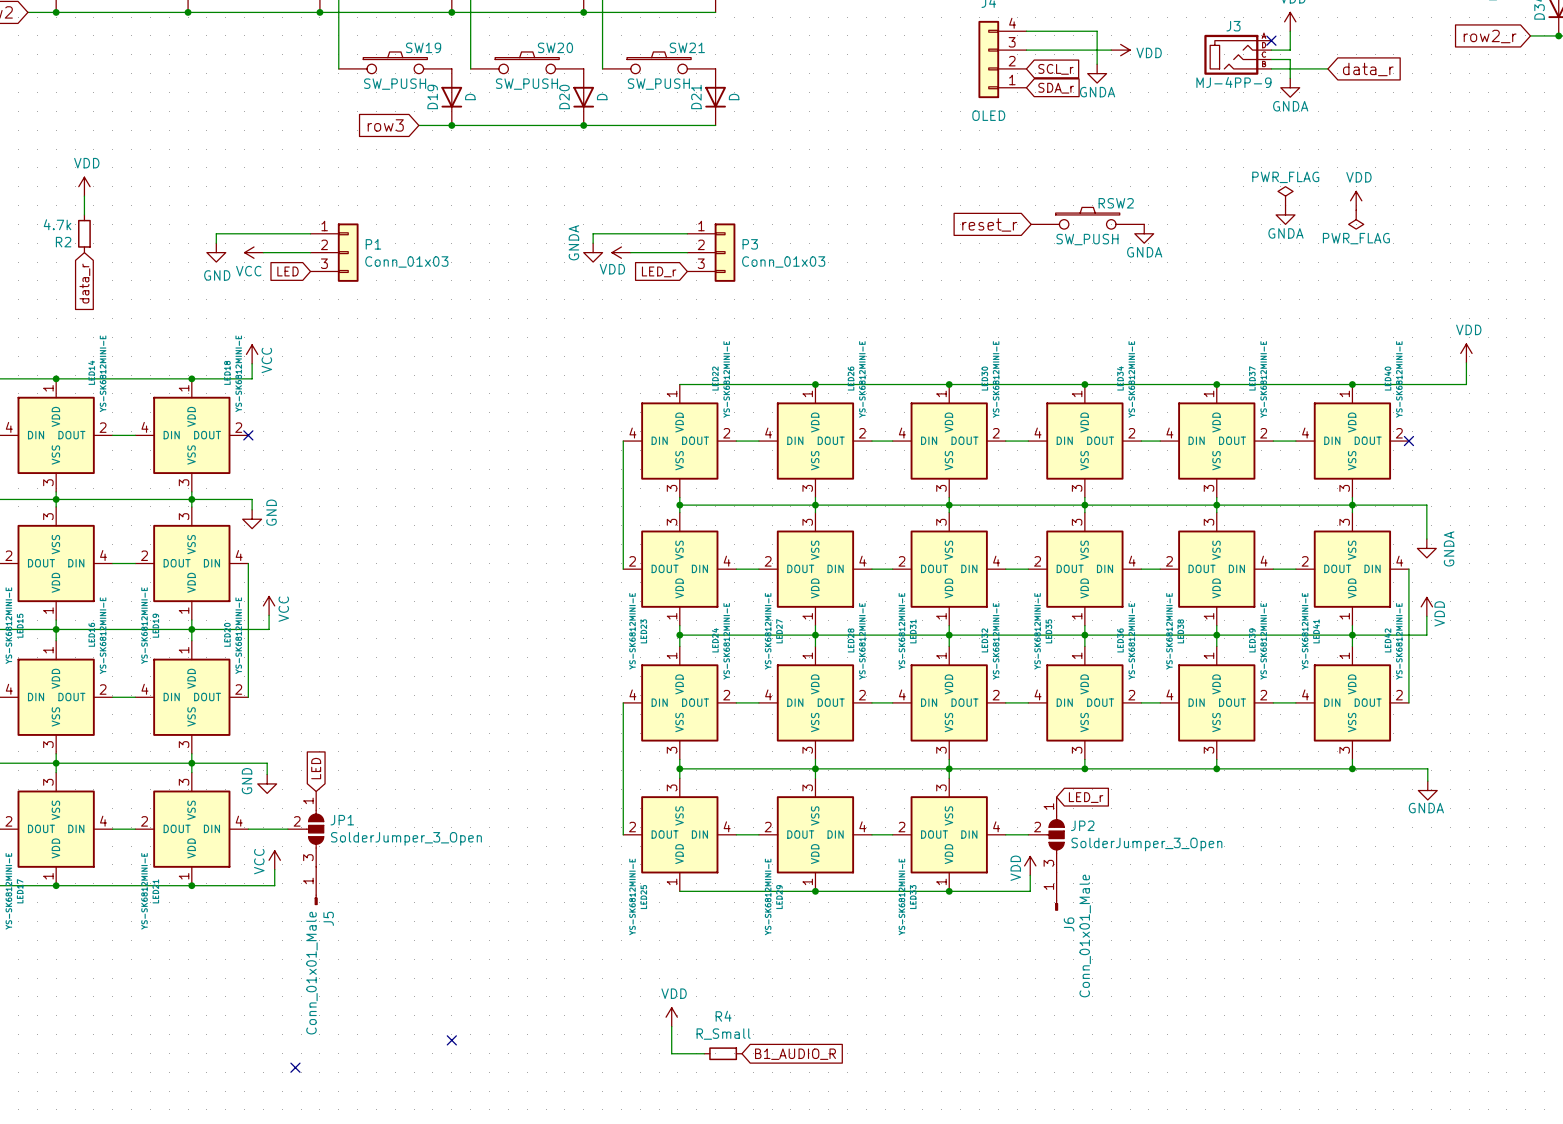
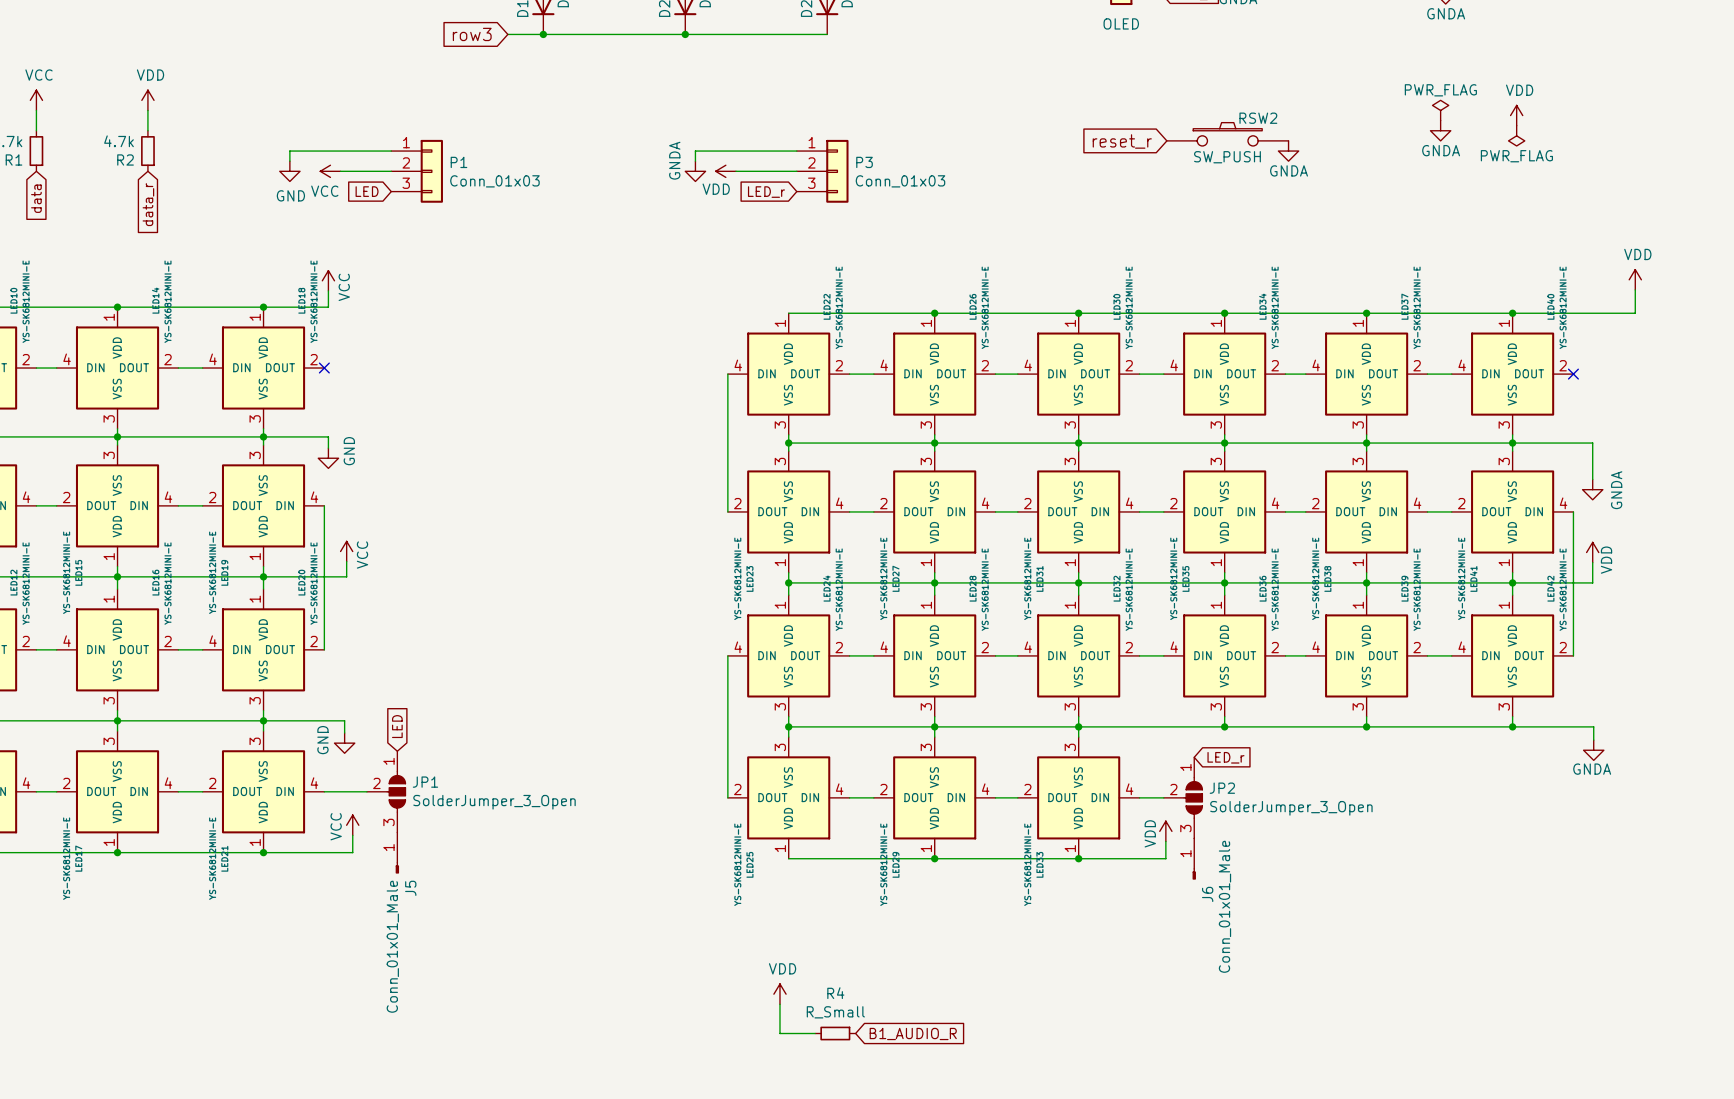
no-connect mark: (451, 1040) -> none
no-connect mark: (295, 1067) -> none

